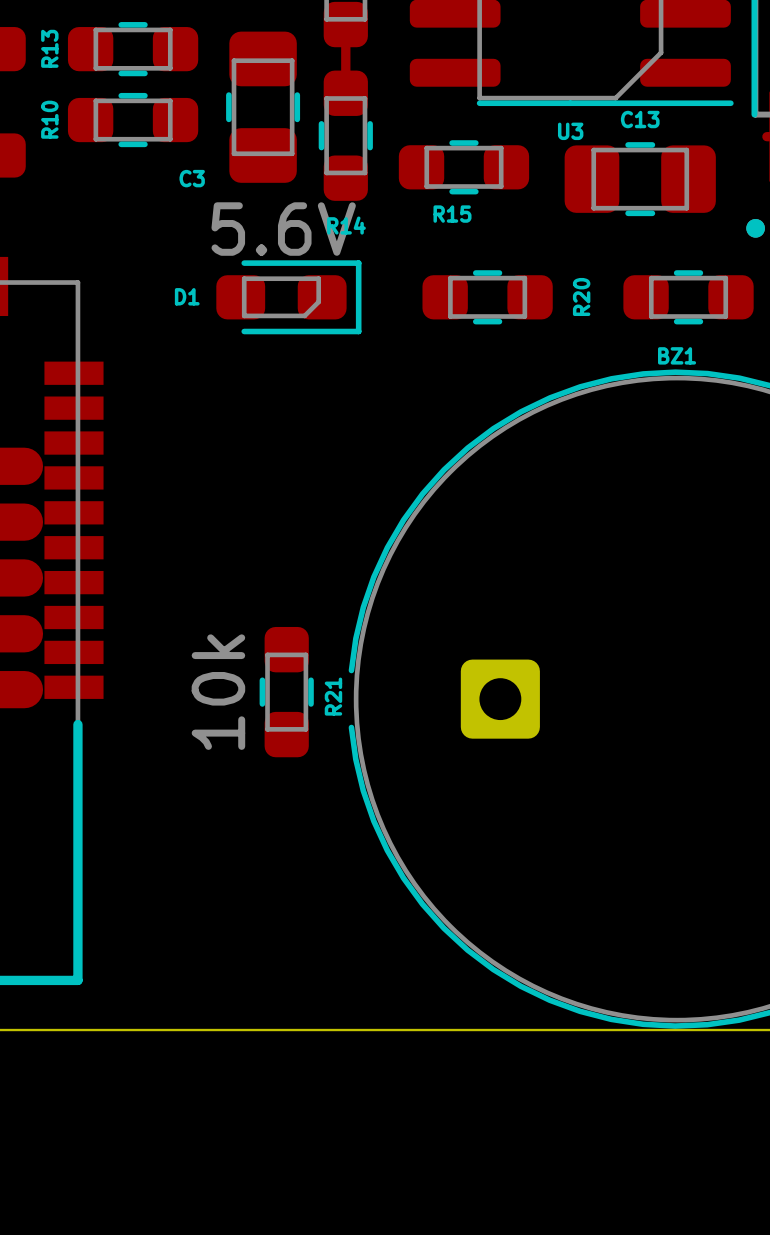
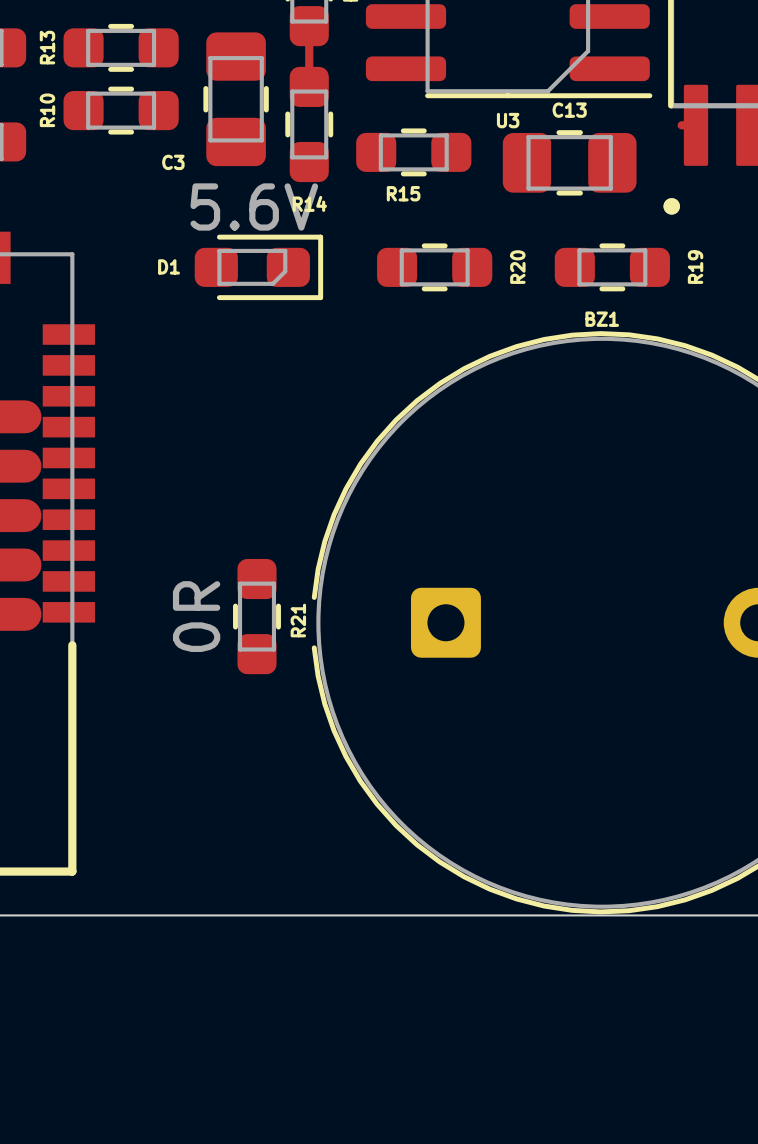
R21 value: 10k (218, 692) -> 0R (196, 616)

